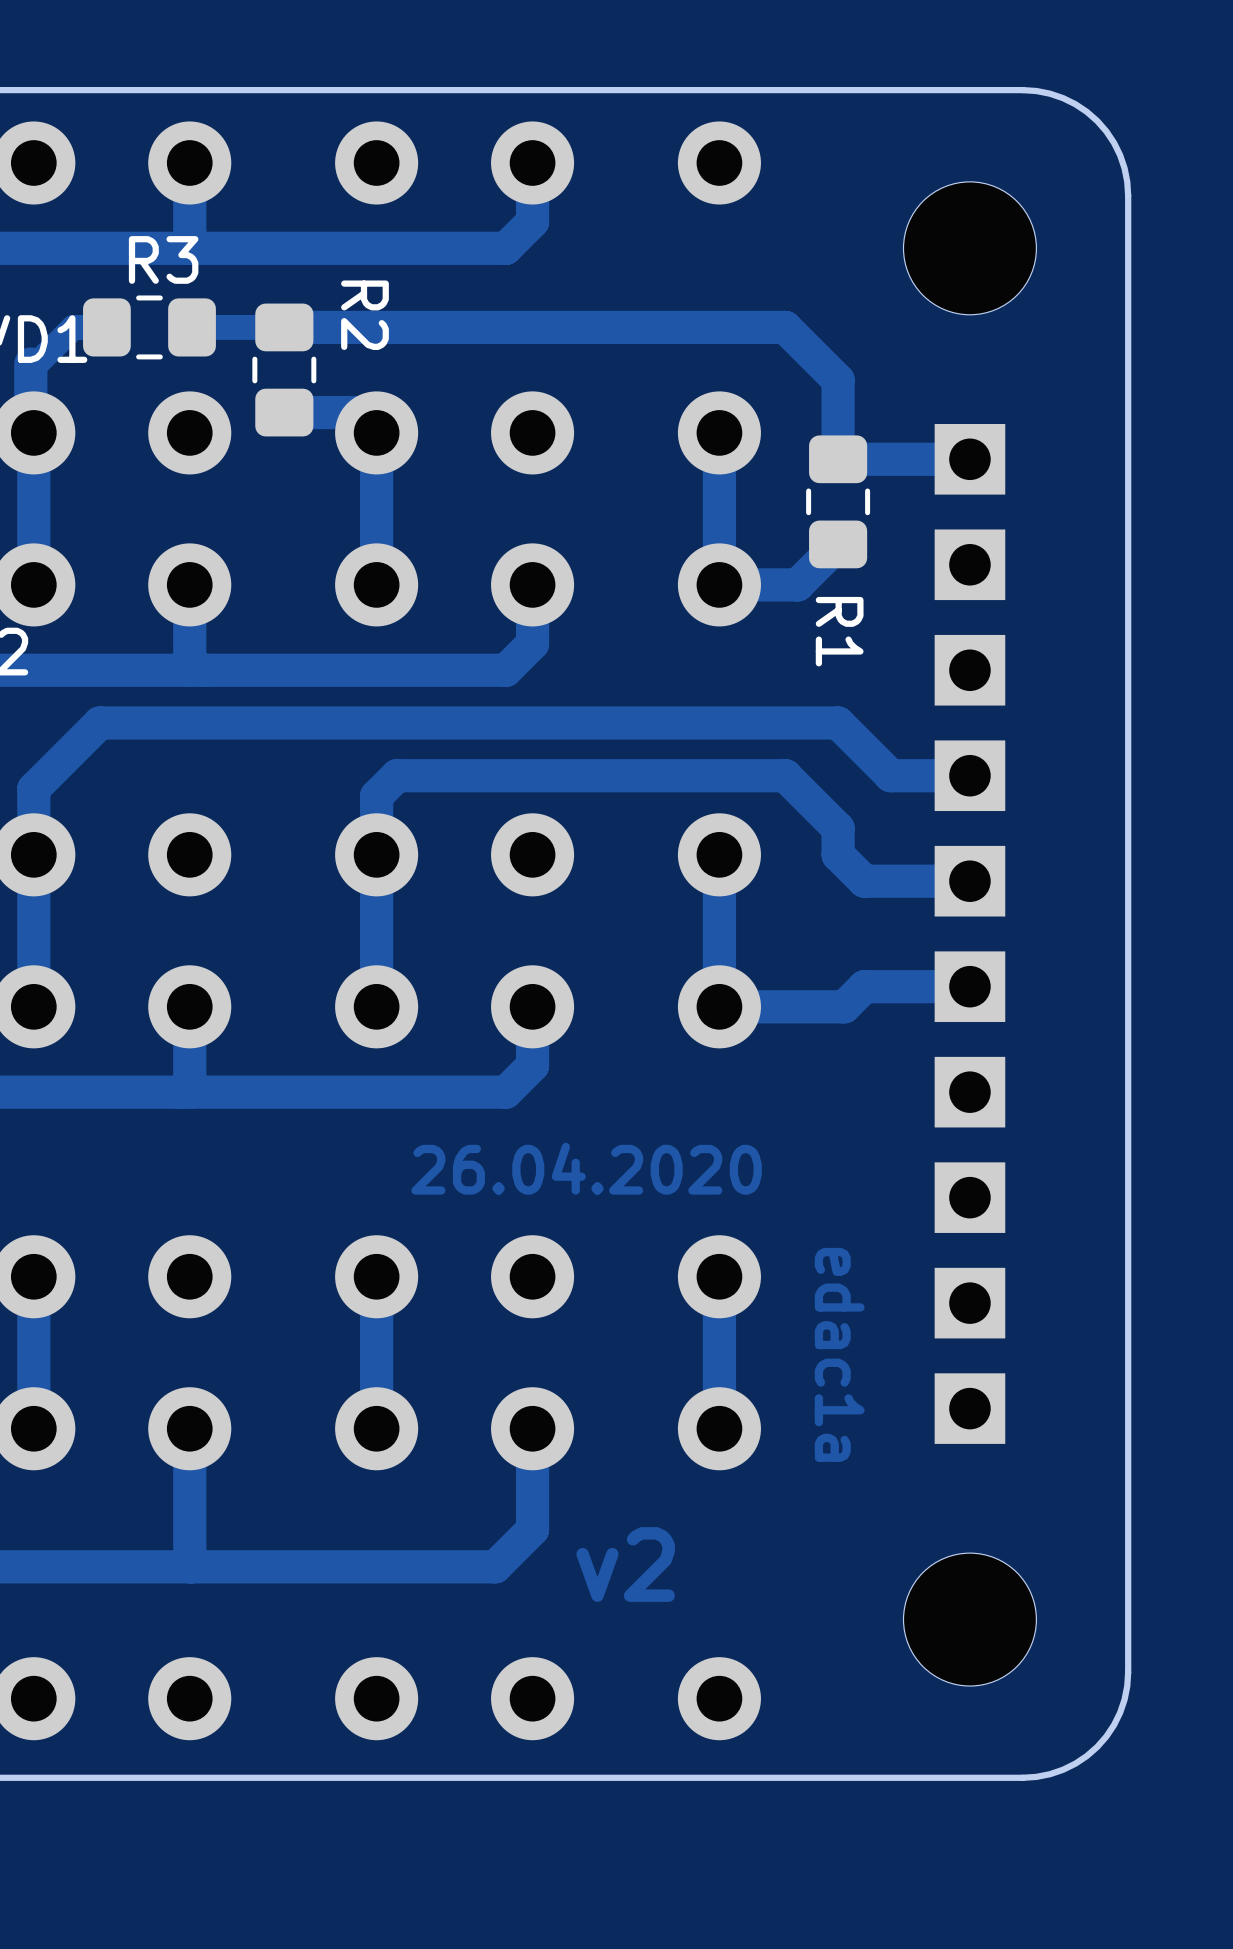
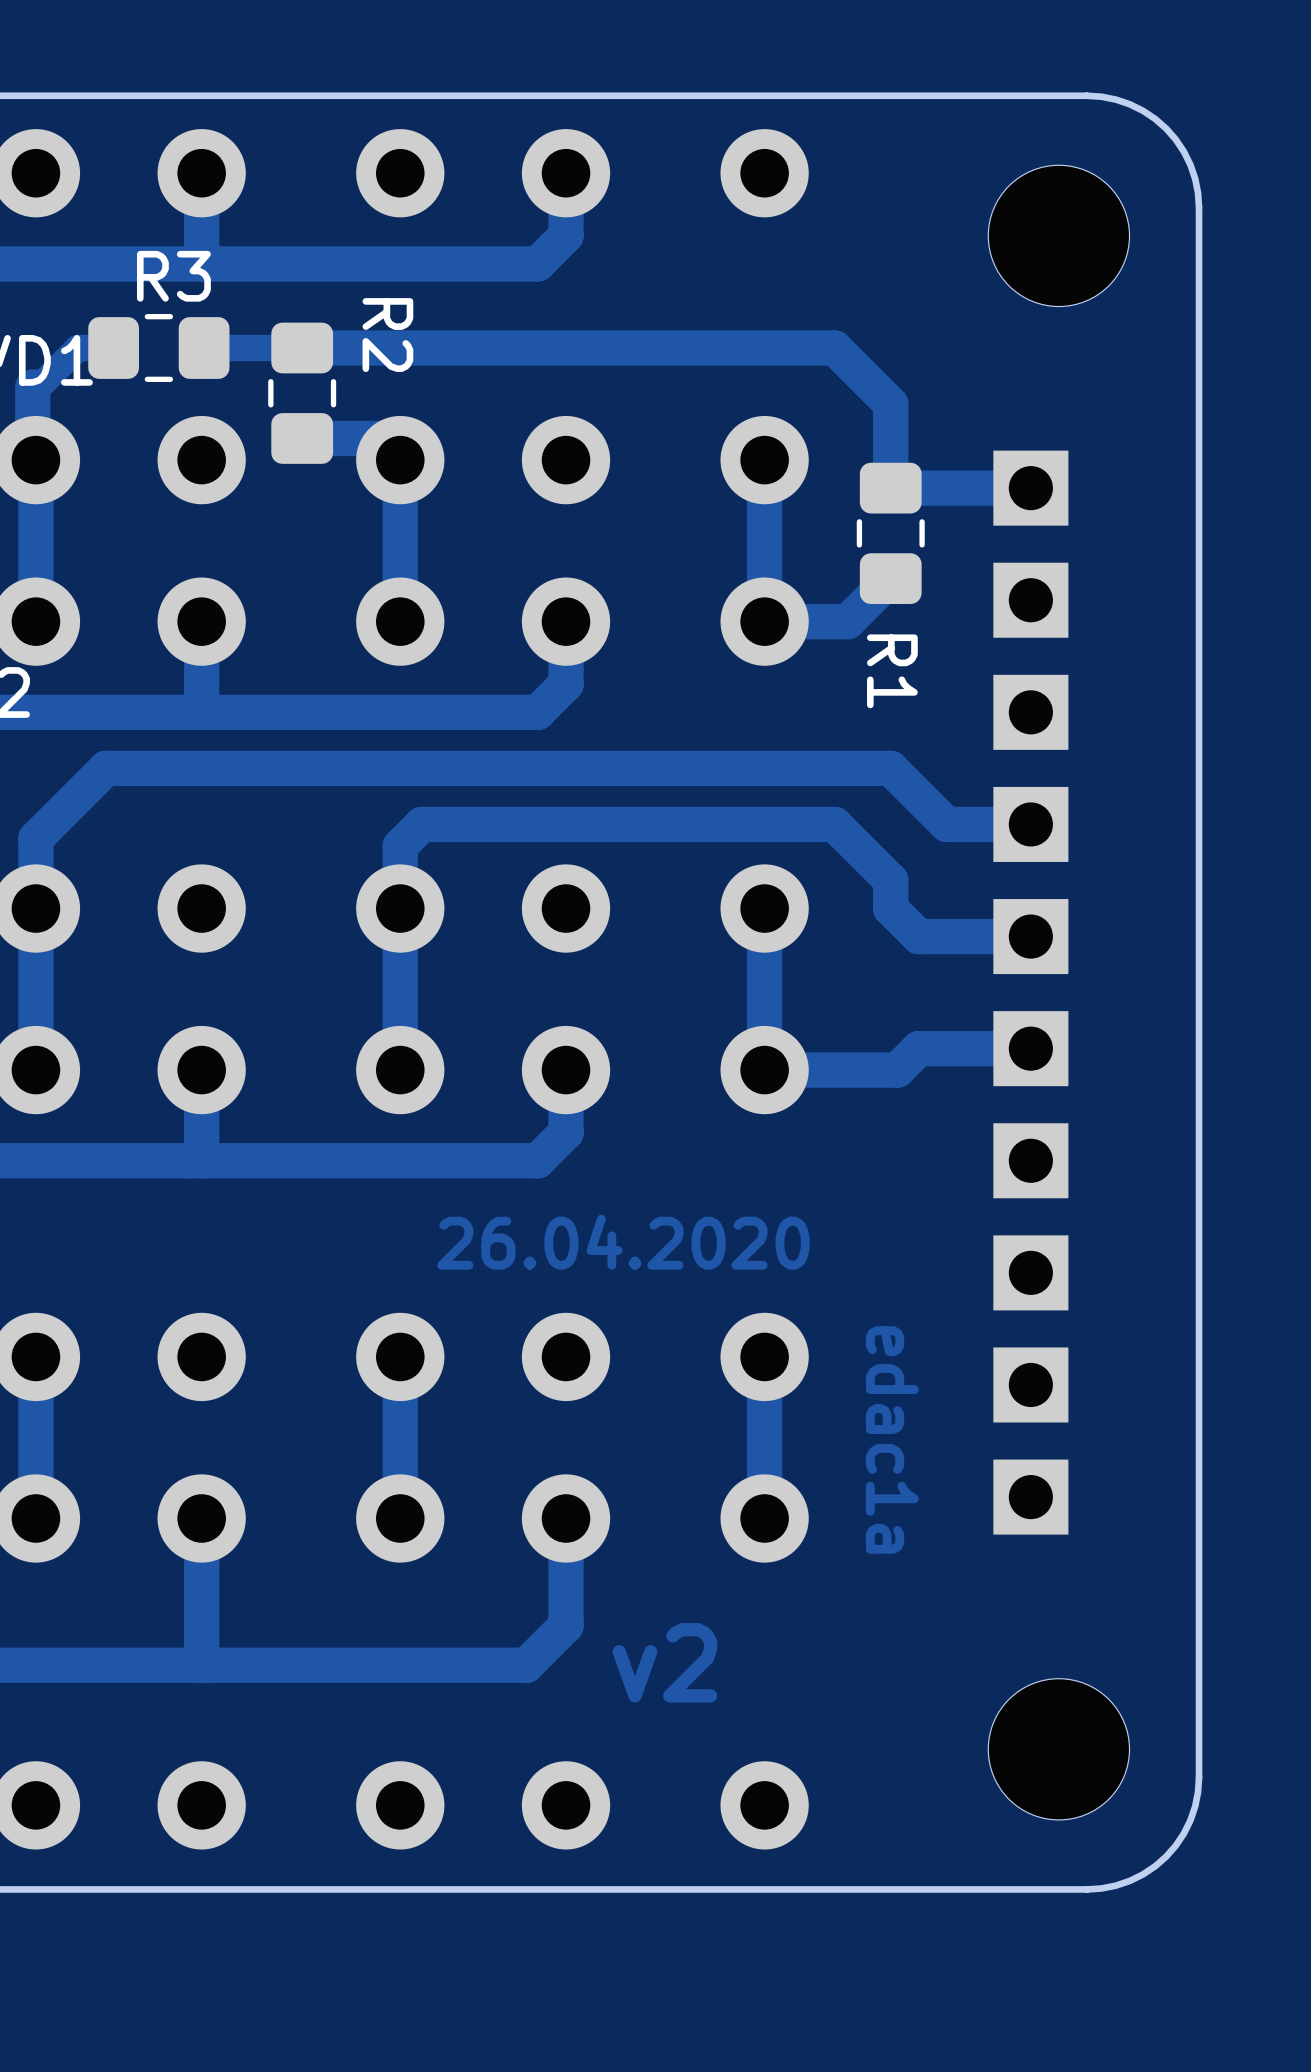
part position: (969, 248) -> (1058, 235)
part position: (969, 1619) -> (1058, 1749)

